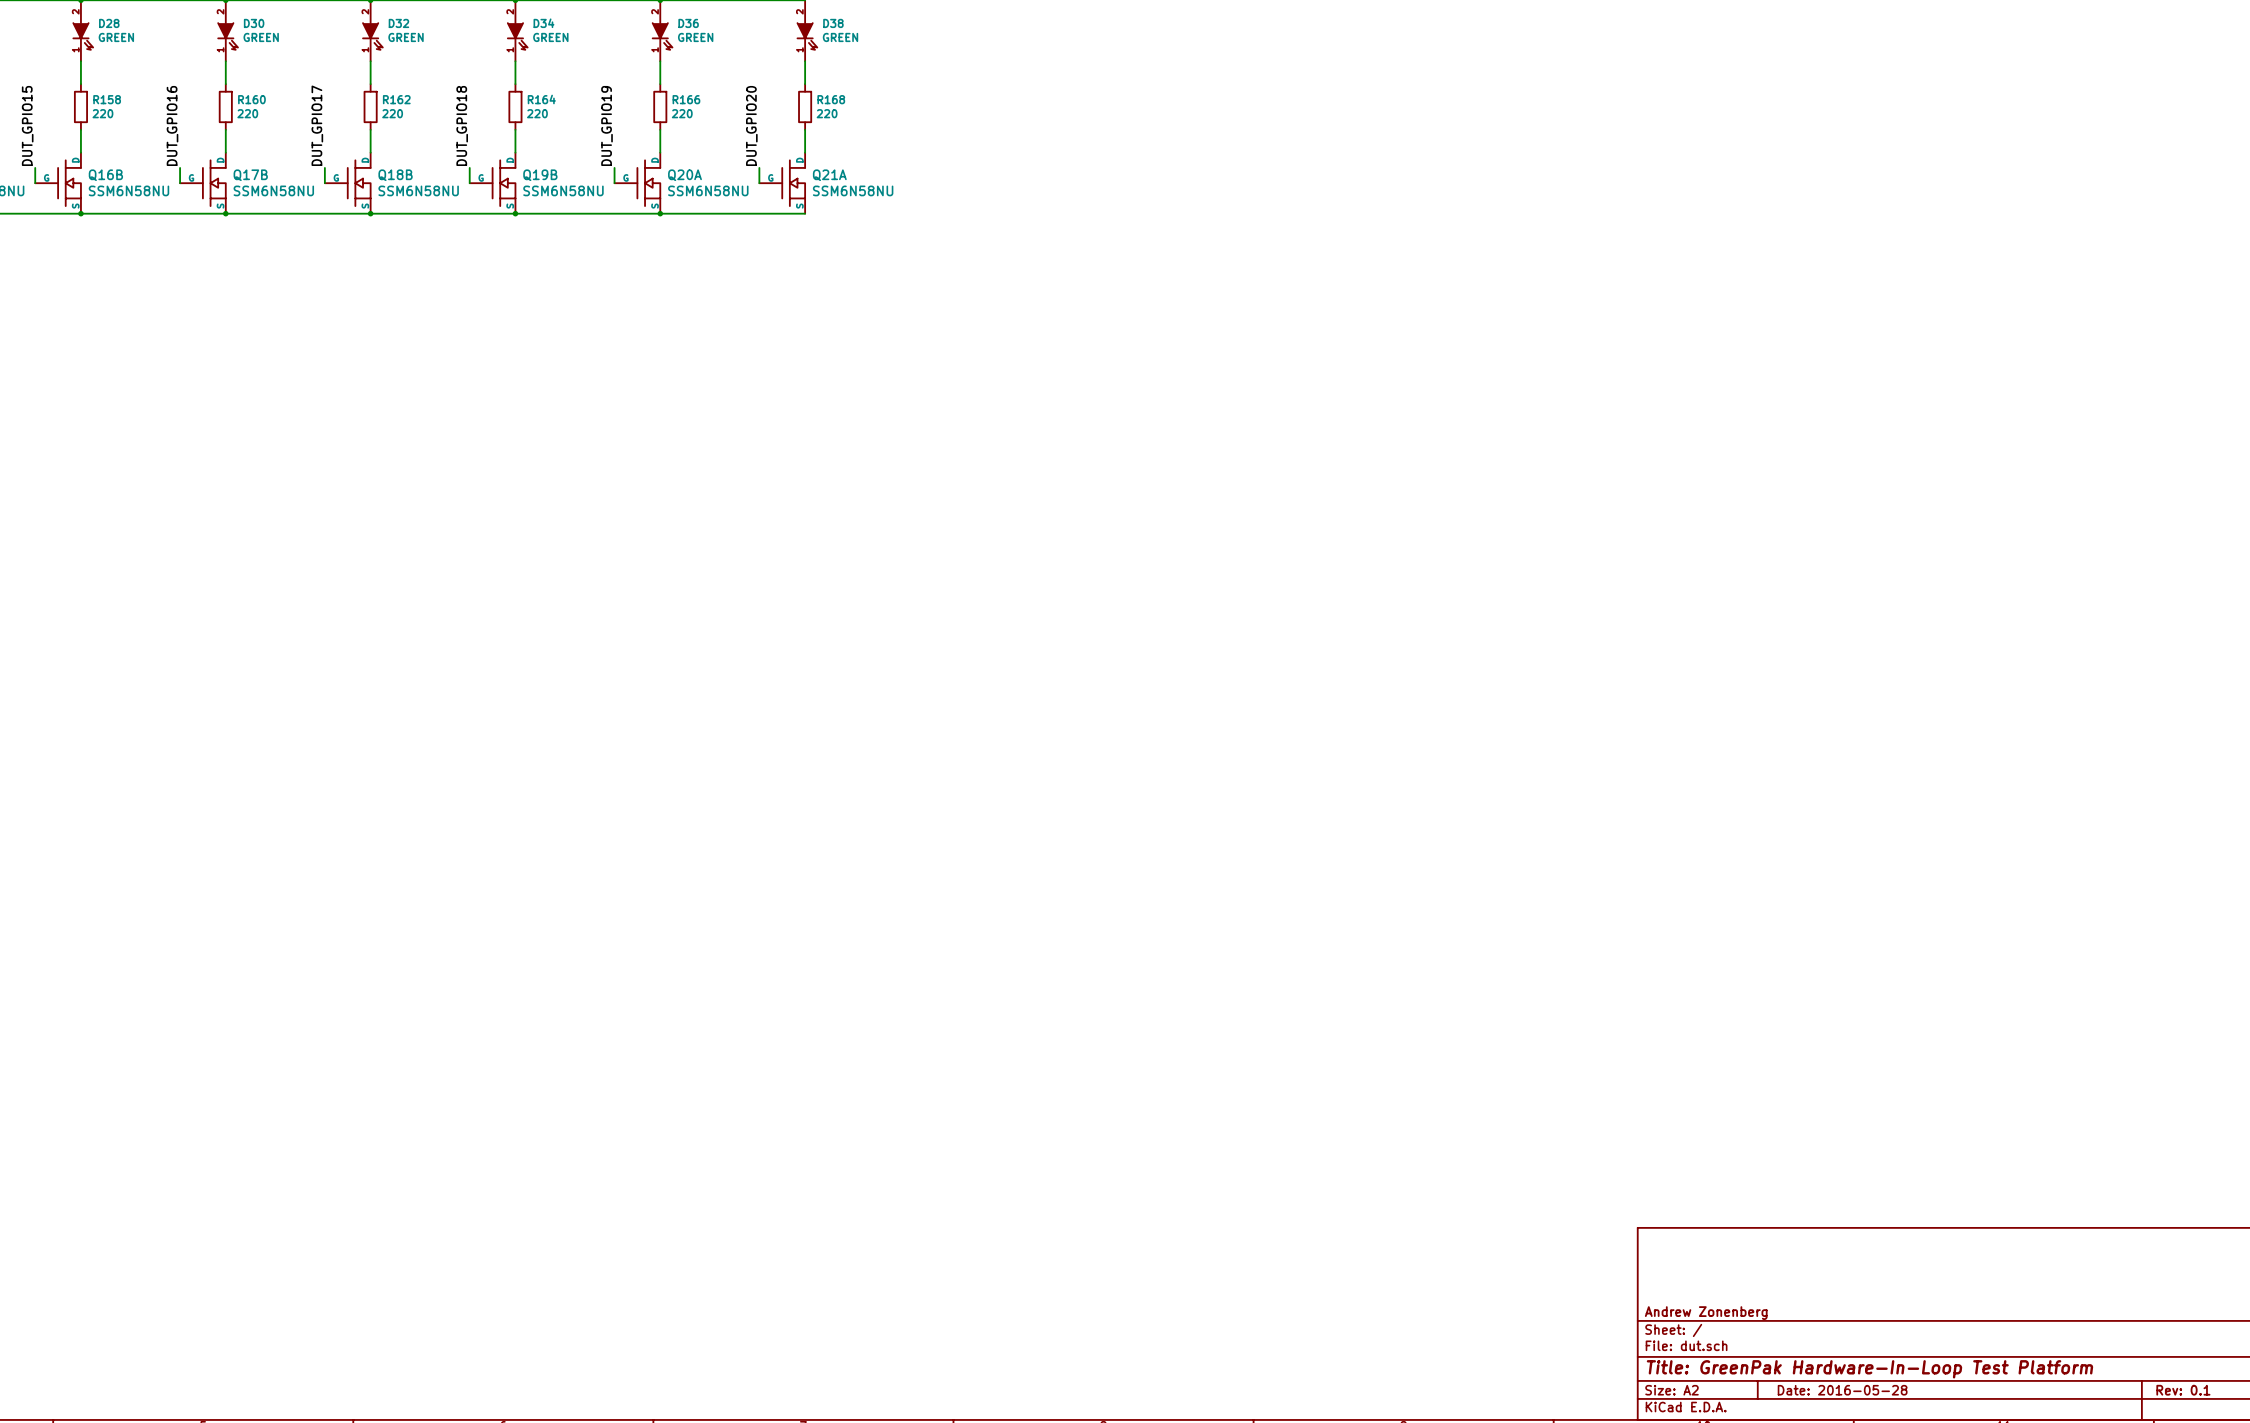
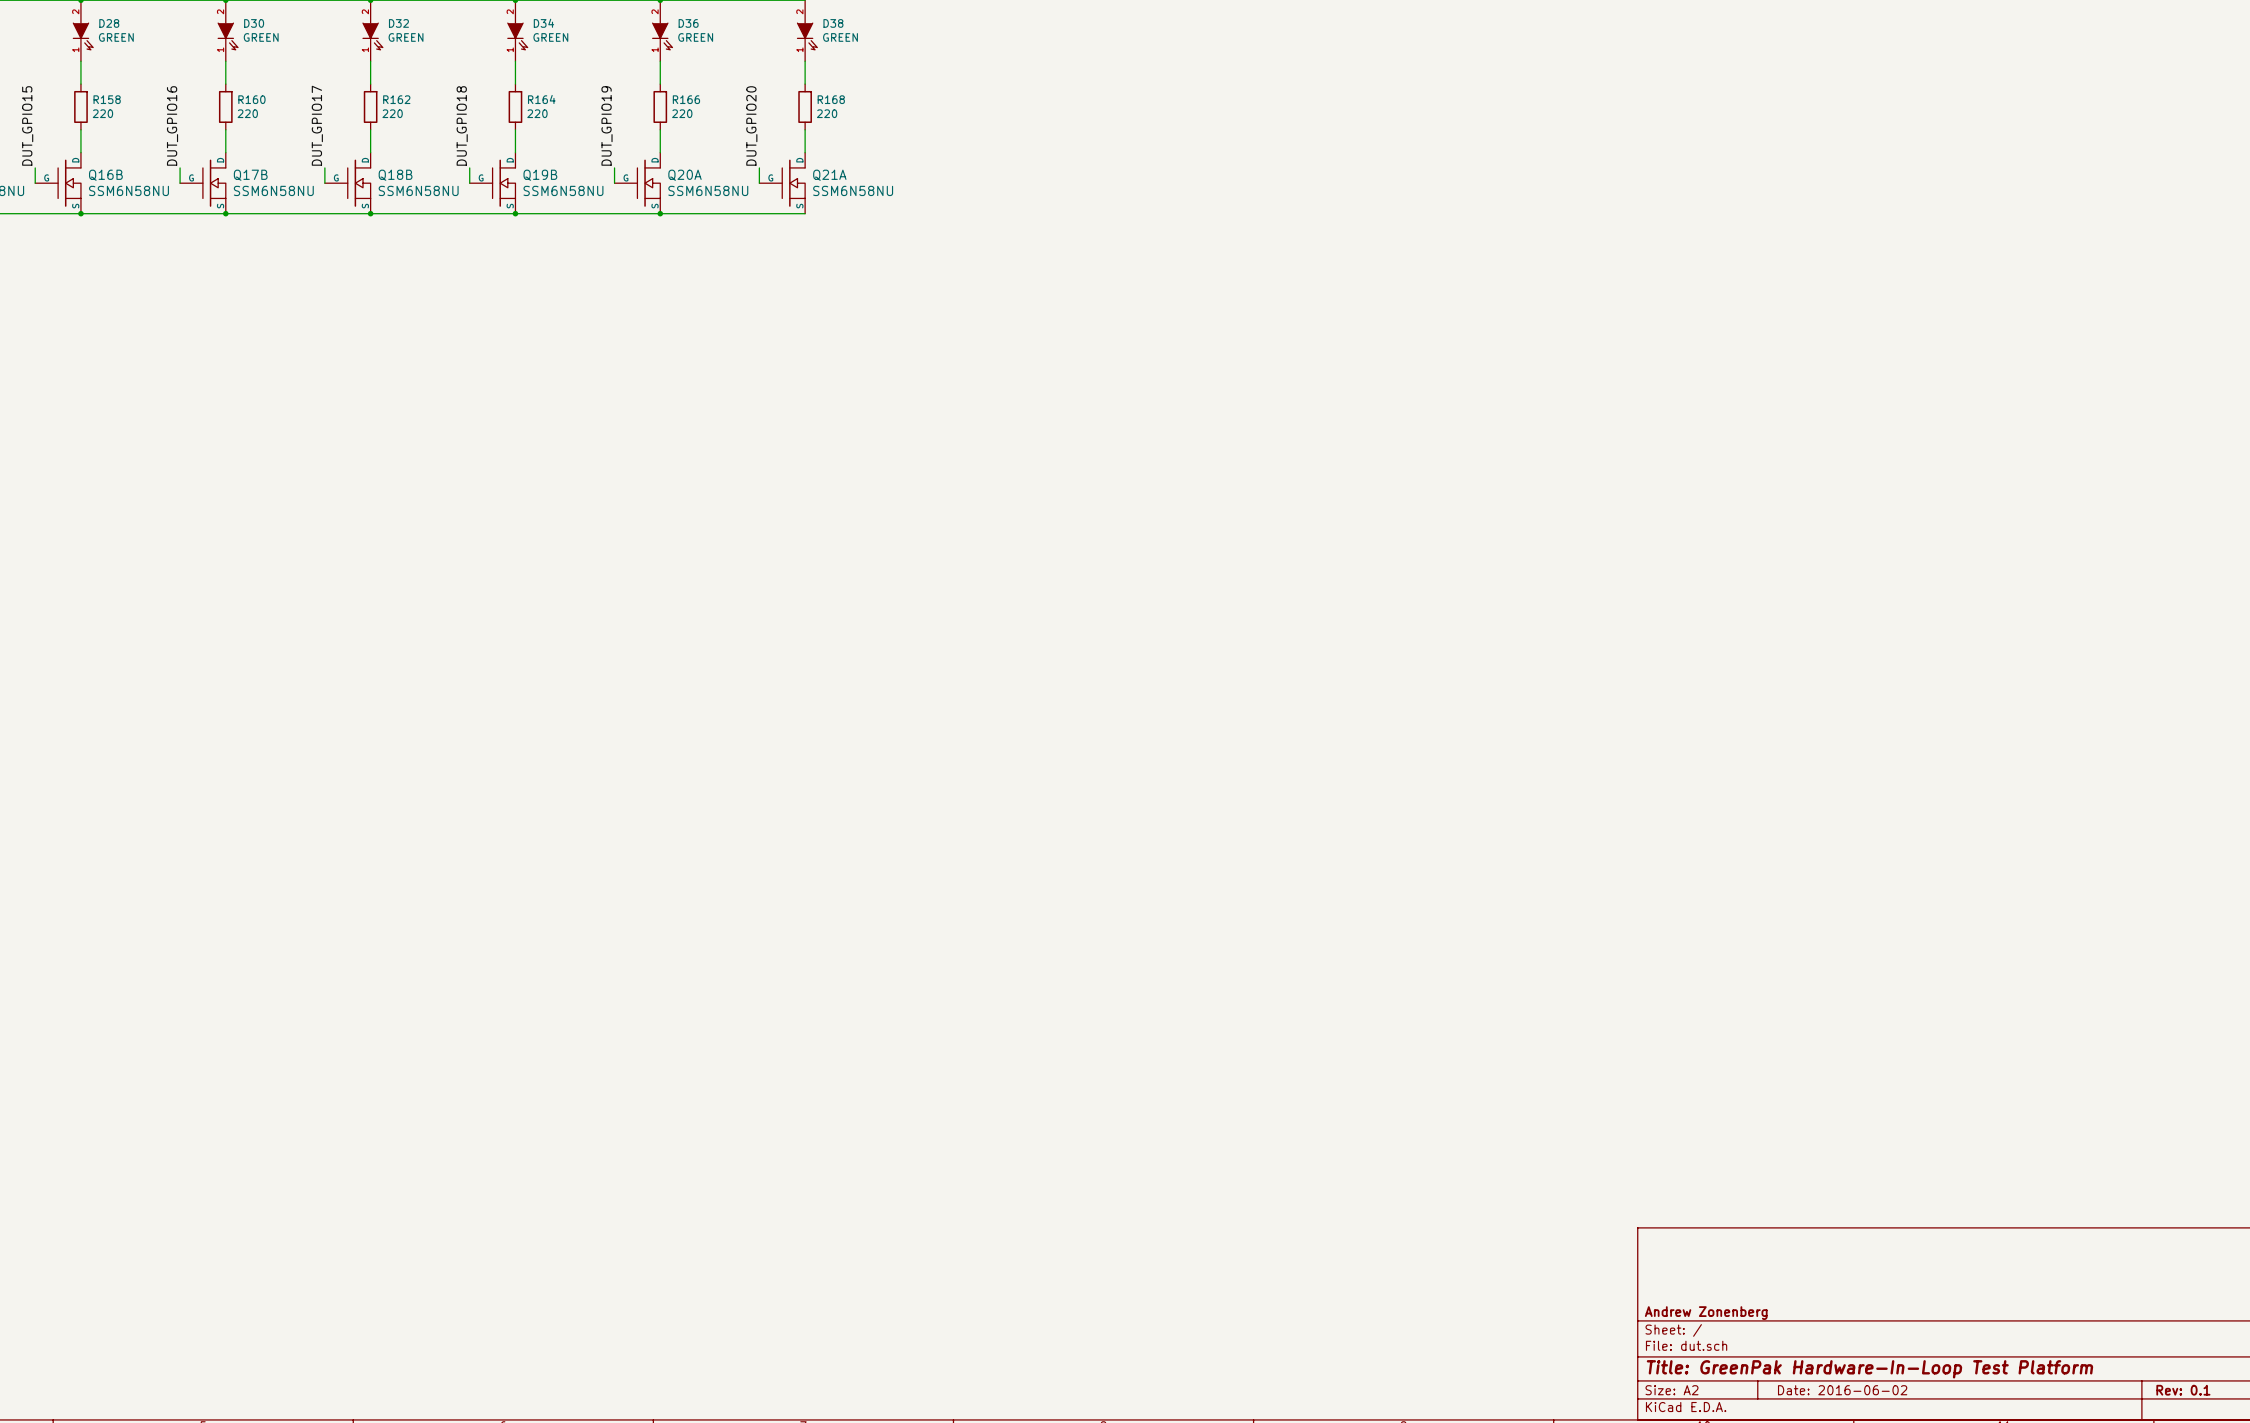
title block: Date: 2016-05-28 (1842, 1390) -> Date: 2016-06-02 (1842, 1390)

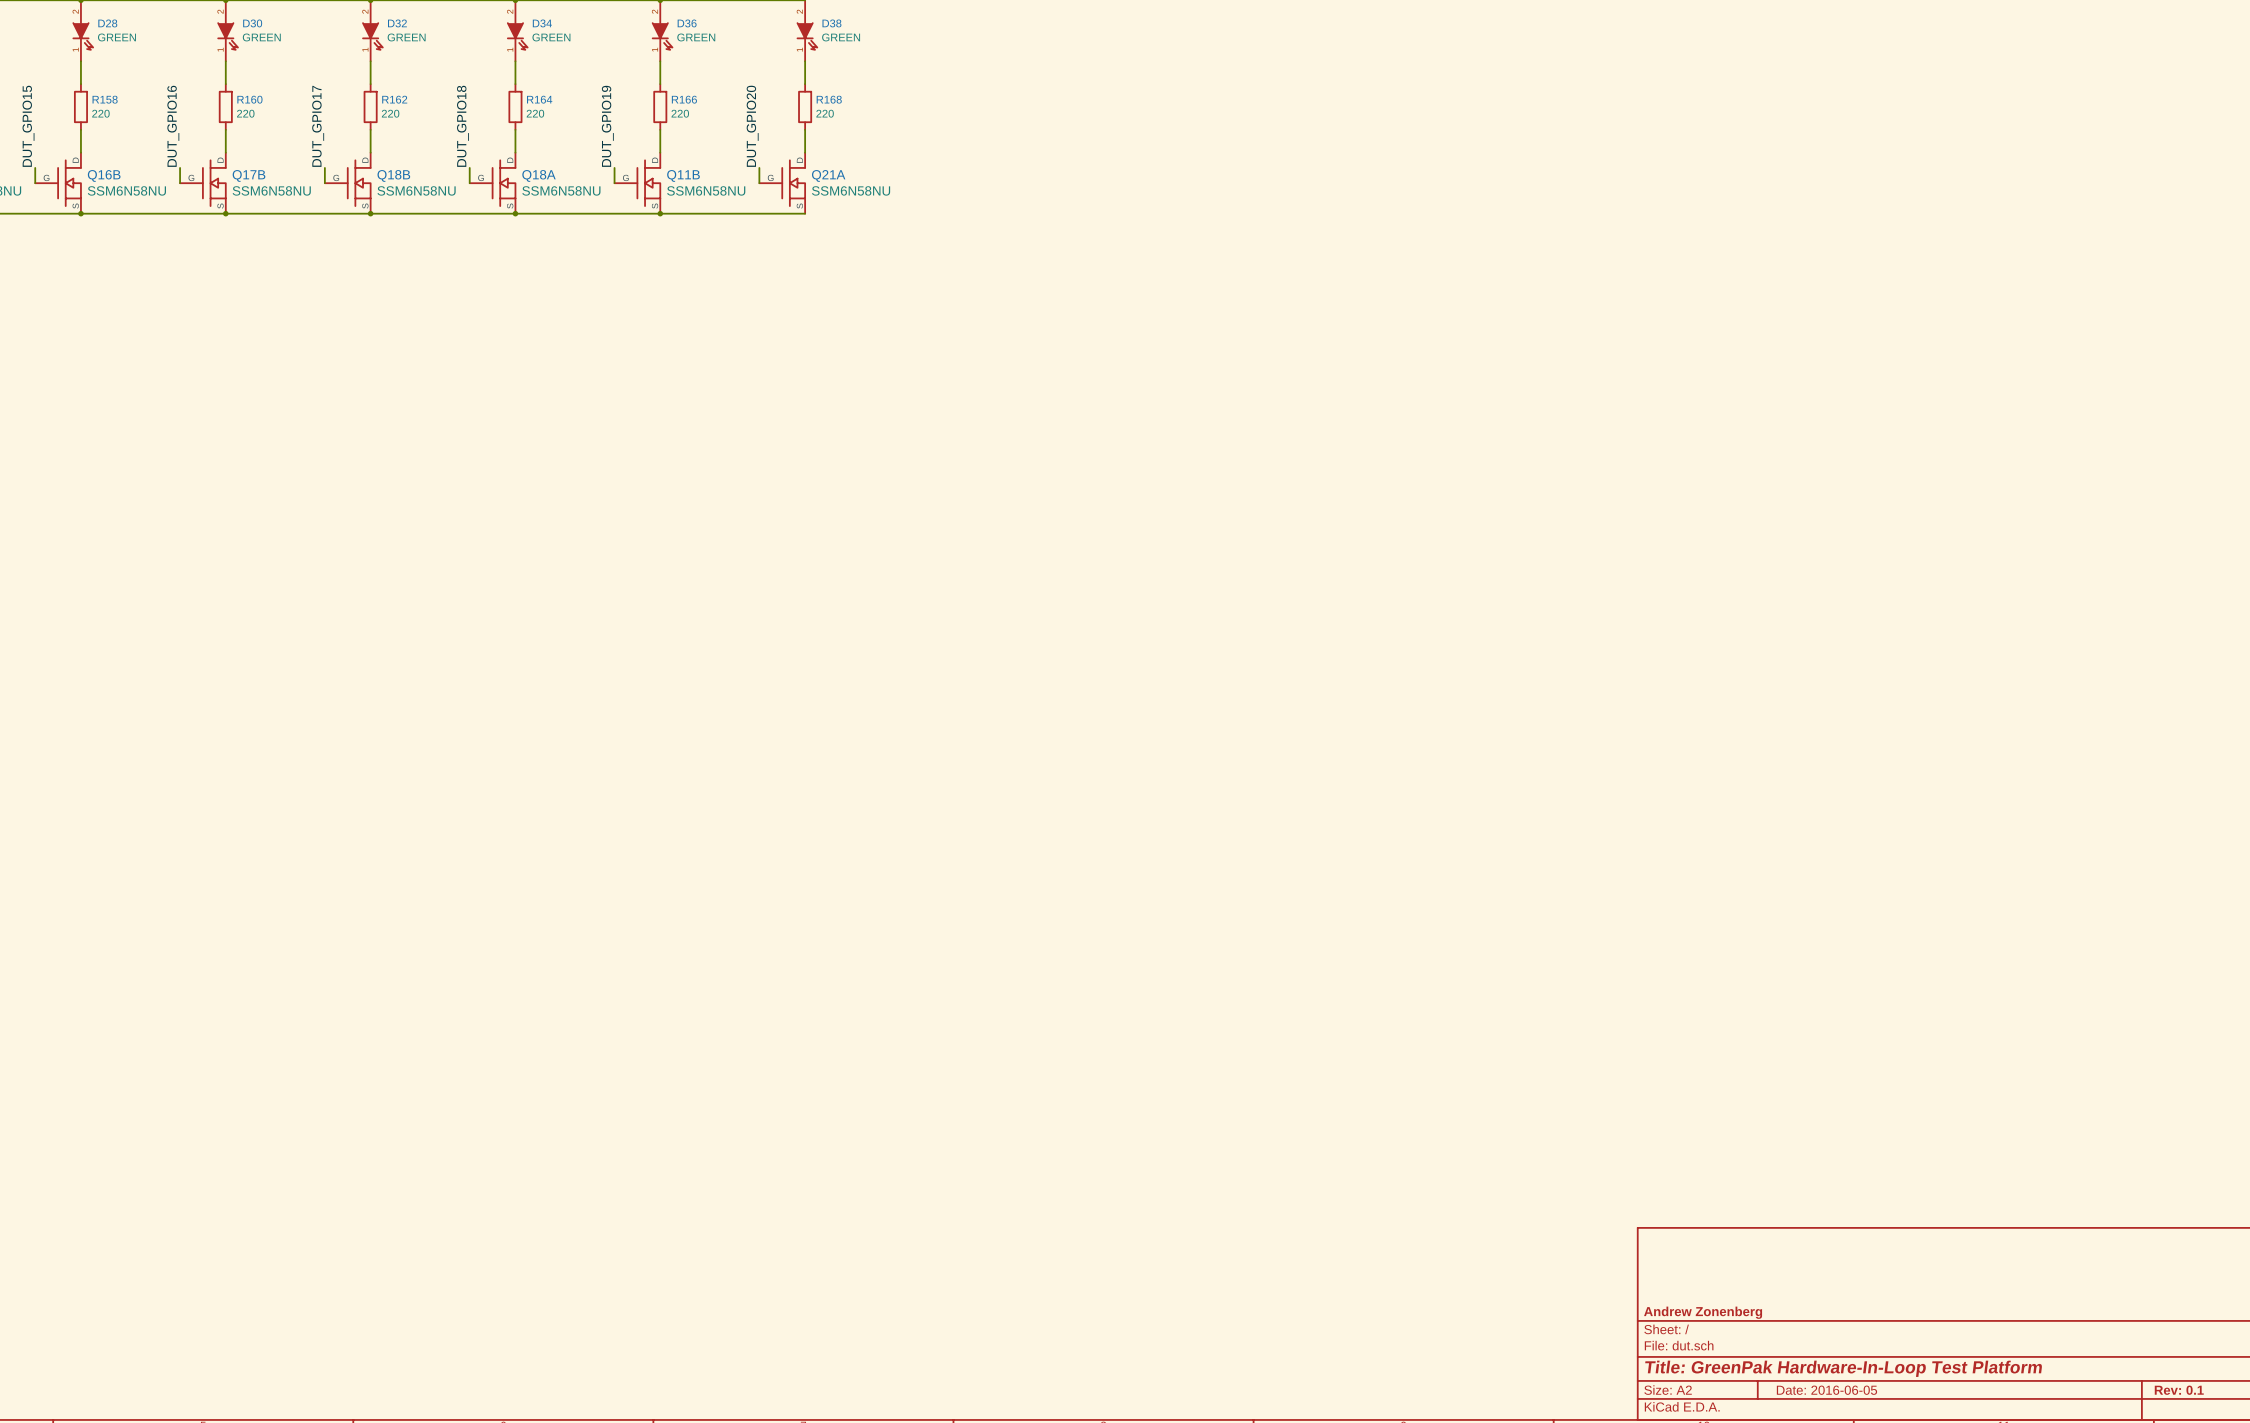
Q19B name: Q19B (540, 175) -> Q18A (539, 175)
Q20A name: Q20A (684, 175) -> Q11B (683, 175)
title block: Date: 2016-06-02 (1842, 1390) -> Date: 2016-06-05 (1826, 1390)

